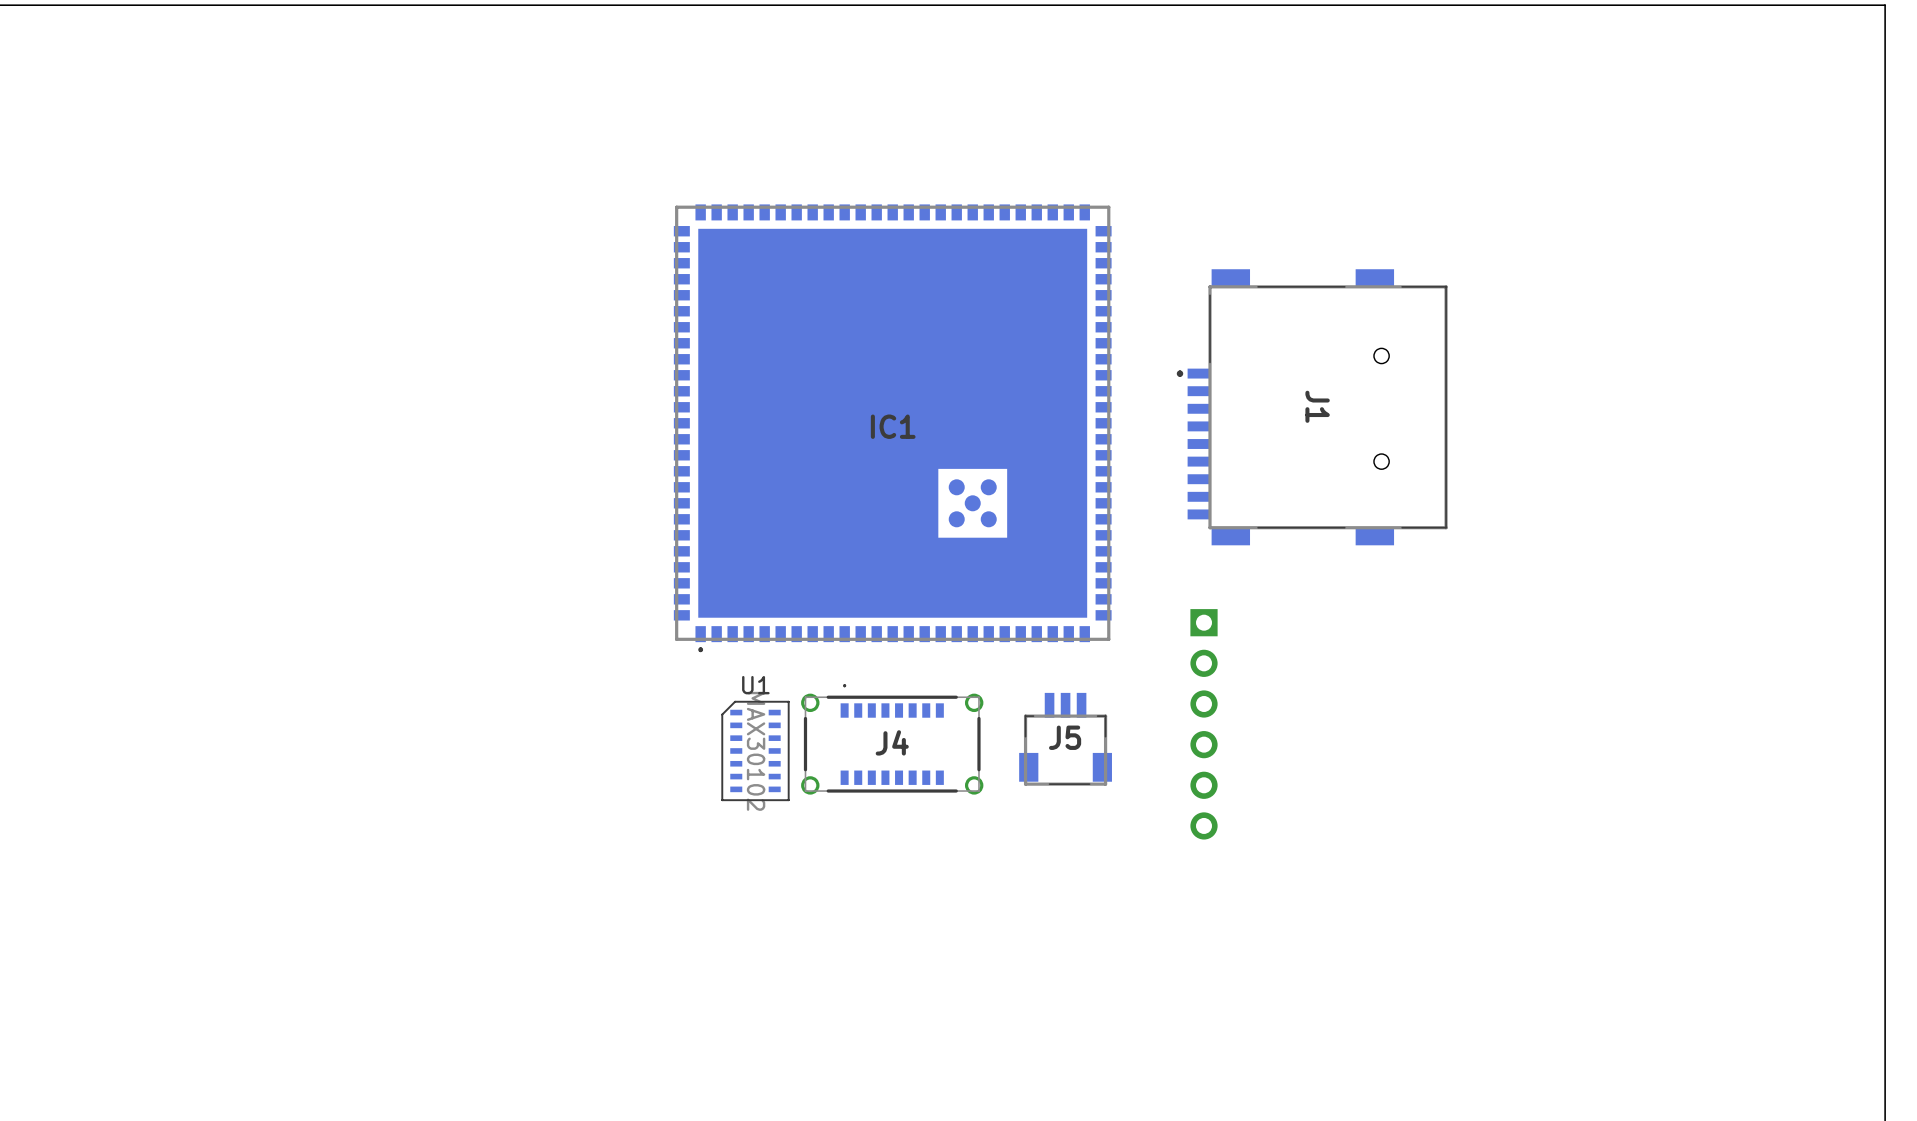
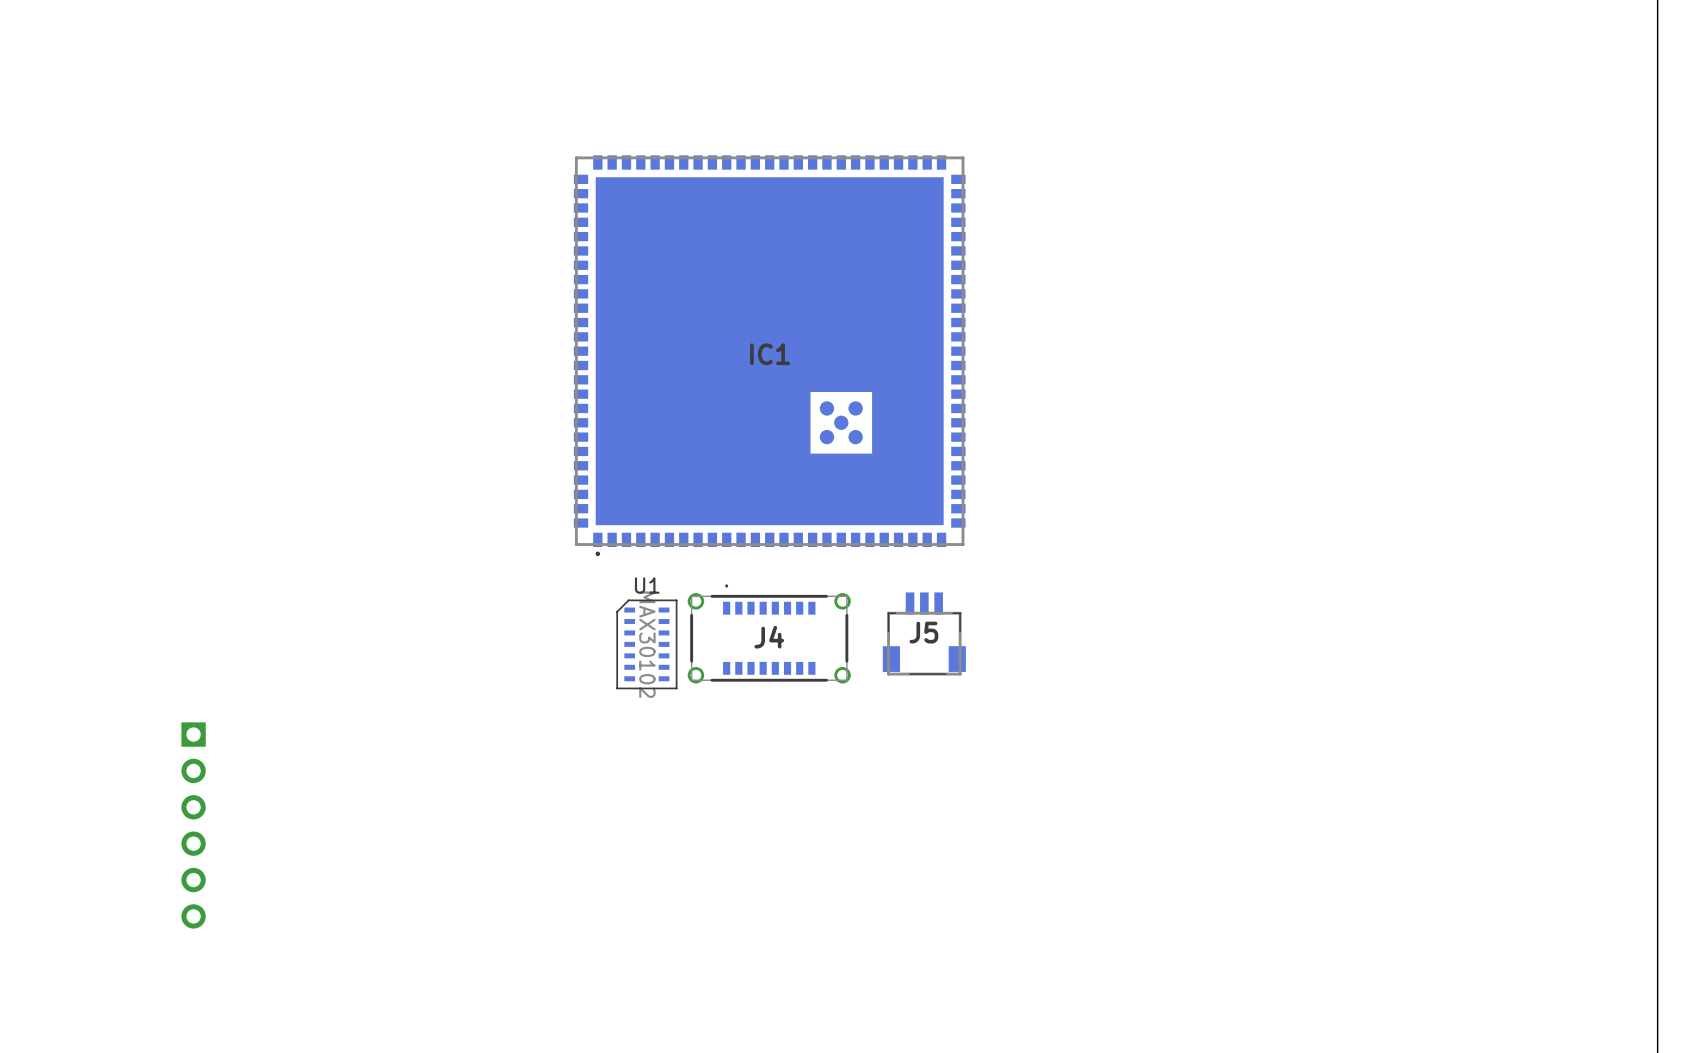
J1: (1312, 407) -> none
part: (1204, 724) -> none
part: none -> (193, 825)

